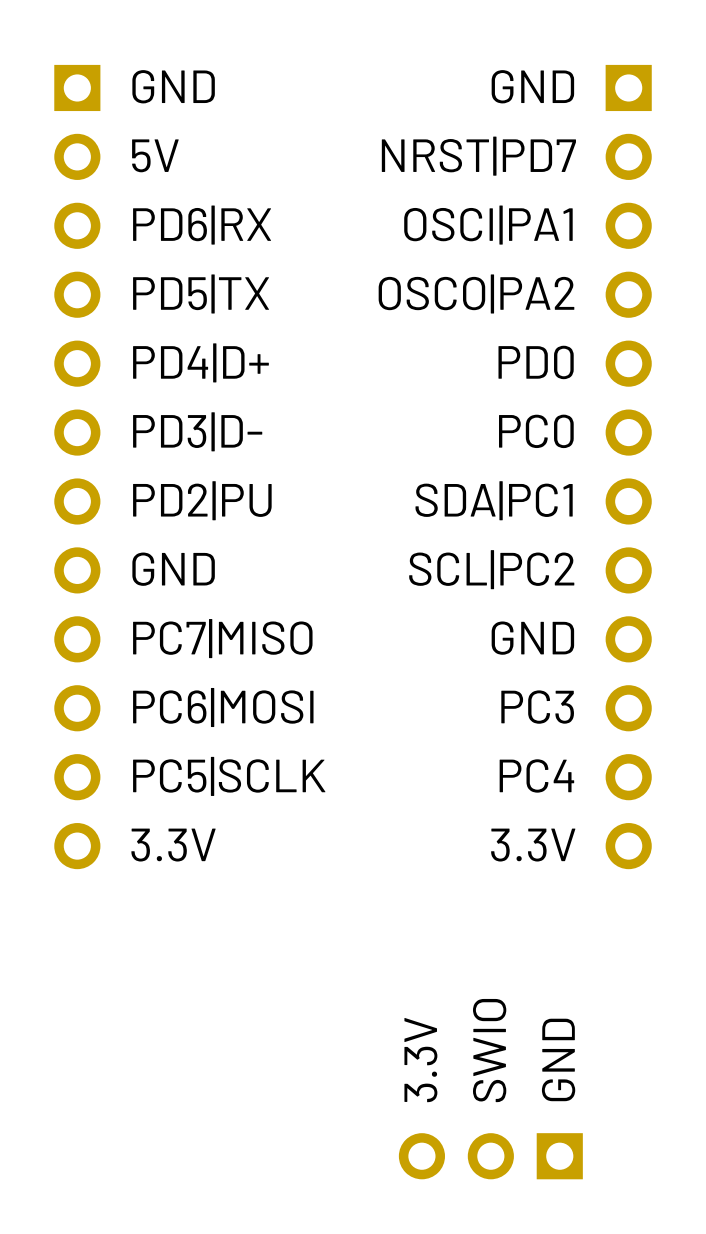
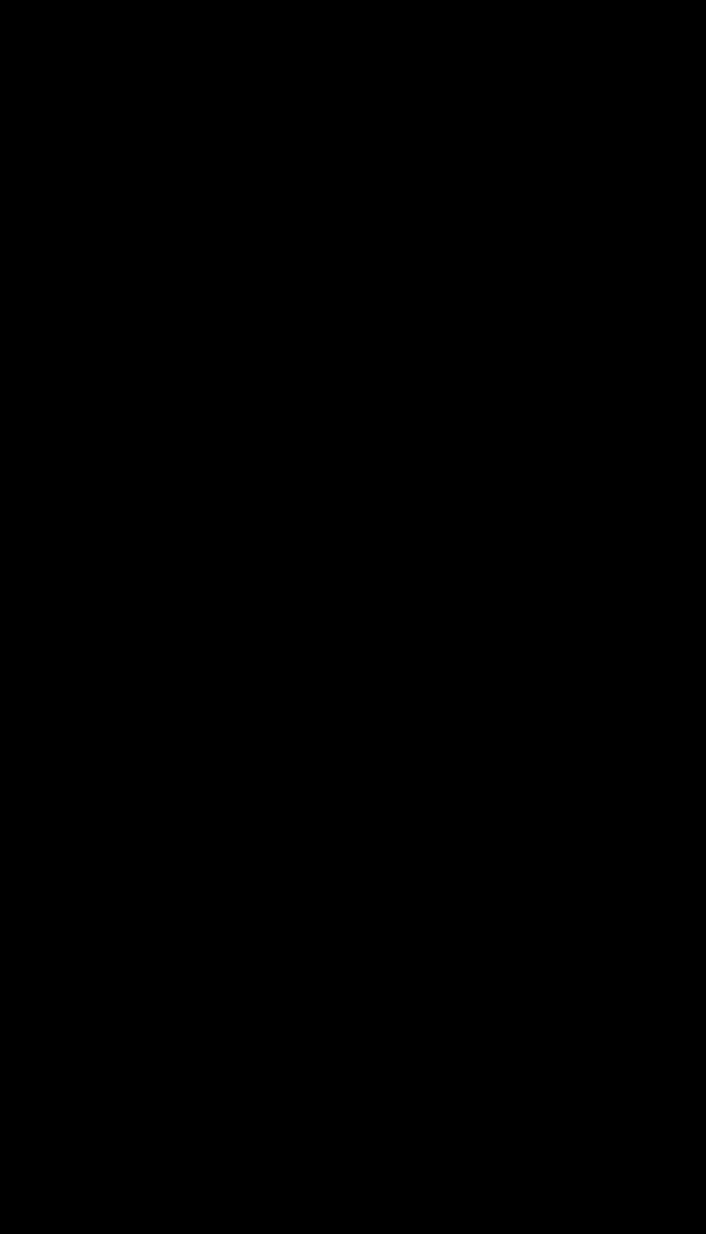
text: GND (173, 86) -> none
text: GND (532, 86) -> none
text: 5V (155, 155) -> none
text: NRST|PD7 (478, 156) -> none
text: PD6|RX (202, 225) -> none
text: OSCI|PA1 (488, 225) -> none
text: PD5|TX (201, 293) -> none
text: OSCO|PA2 (476, 293) -> none
text: PD4|D+ (200, 362) -> none
text: PD0 (536, 362) -> none
text: PD3|D- (197, 431) -> none
text: PC0 (536, 431) -> none
part: (77, 467) -> none
part: (628, 467) -> none
text: PD2|PU (202, 500) -> none
text: SDA|PC1 (494, 500) -> none
text: GND (173, 569) -> none
text: SCL|PC2 (491, 569) -> none
text: PC7|MISO (222, 638) -> none
text: GND (532, 638) -> none
text: PC6|MOSI (223, 707) -> none
text: PC3 (537, 707) -> none
text: PC4 (536, 775) -> none
text: PC5|SCLK (229, 776) -> none
text: 3.3V (173, 845) -> none
text: 3.3V (533, 845) -> none
text: SWIO (489, 1050) -> none
text: GND (558, 1059) -> none
text: 3.3V (420, 1060) -> none
part: (490, 1156) -> none

